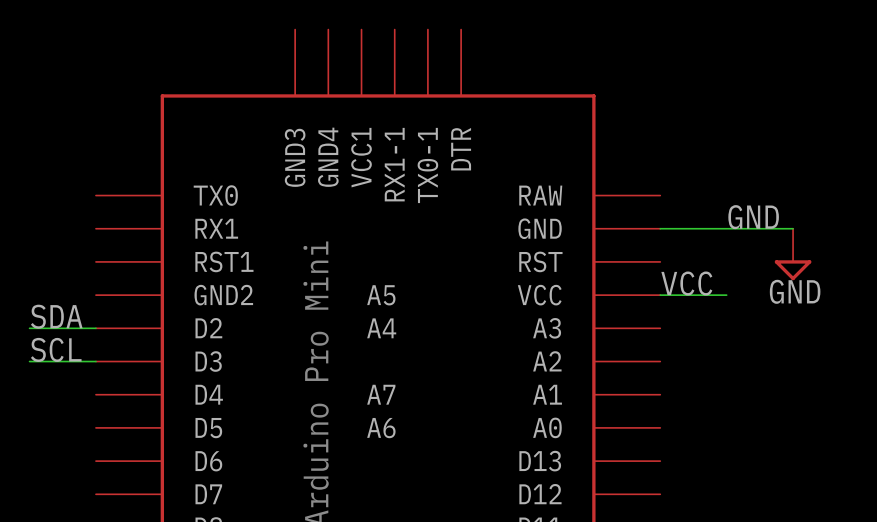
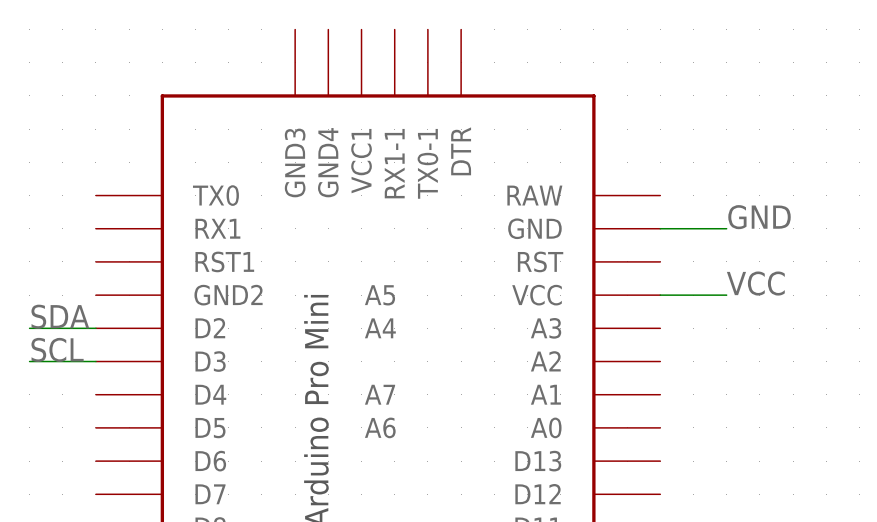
wire: (726, 228) (793, 228) -> none
power symbol: GND (793, 254) -> none
label position: VCC (686, 283) -> VCC (755, 283)

